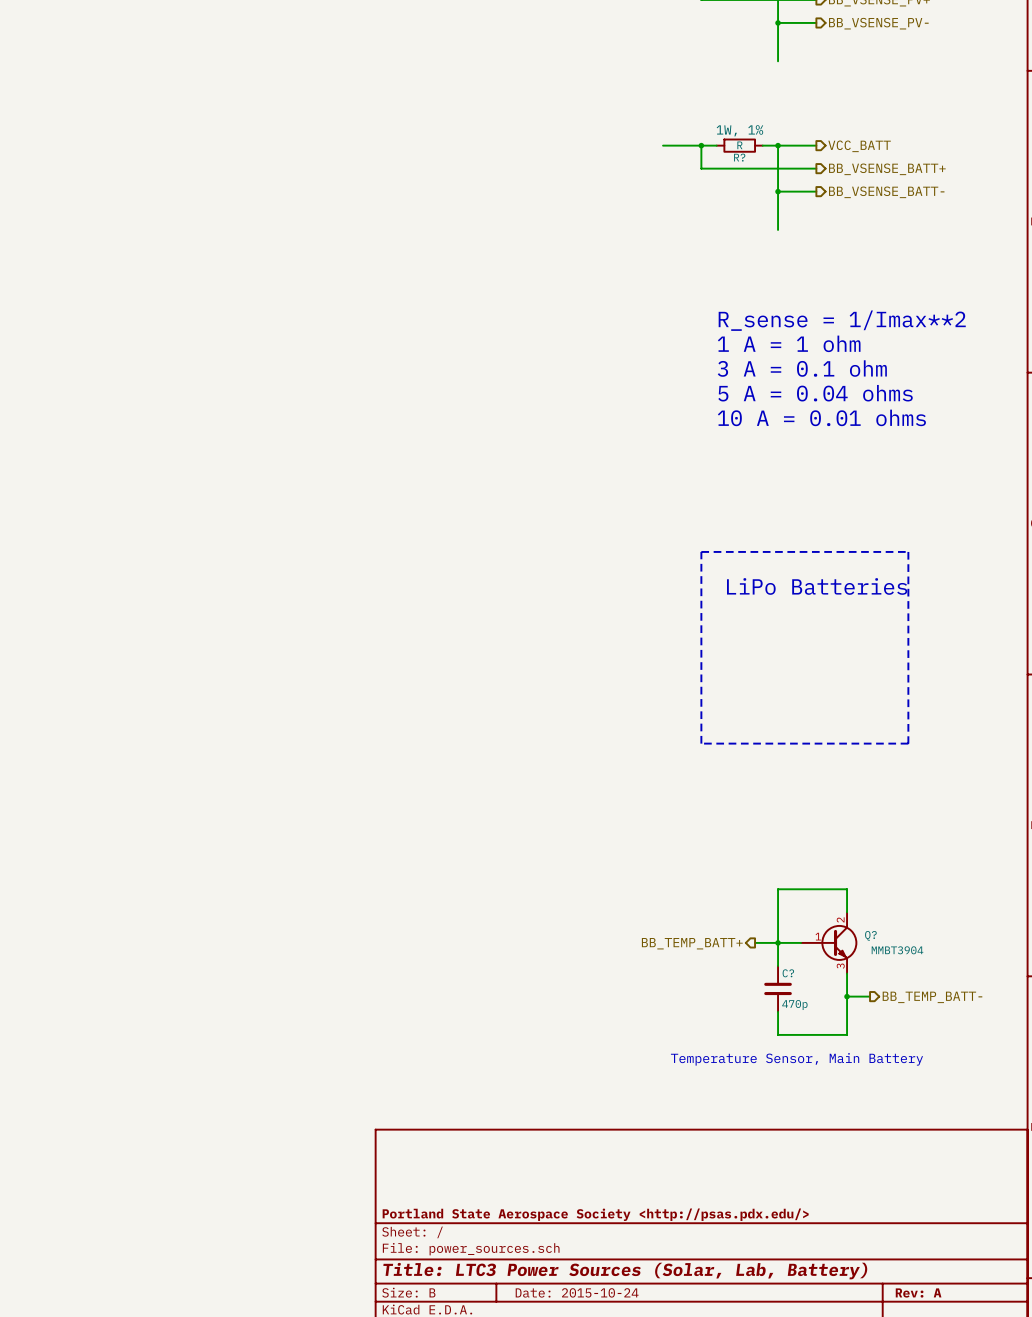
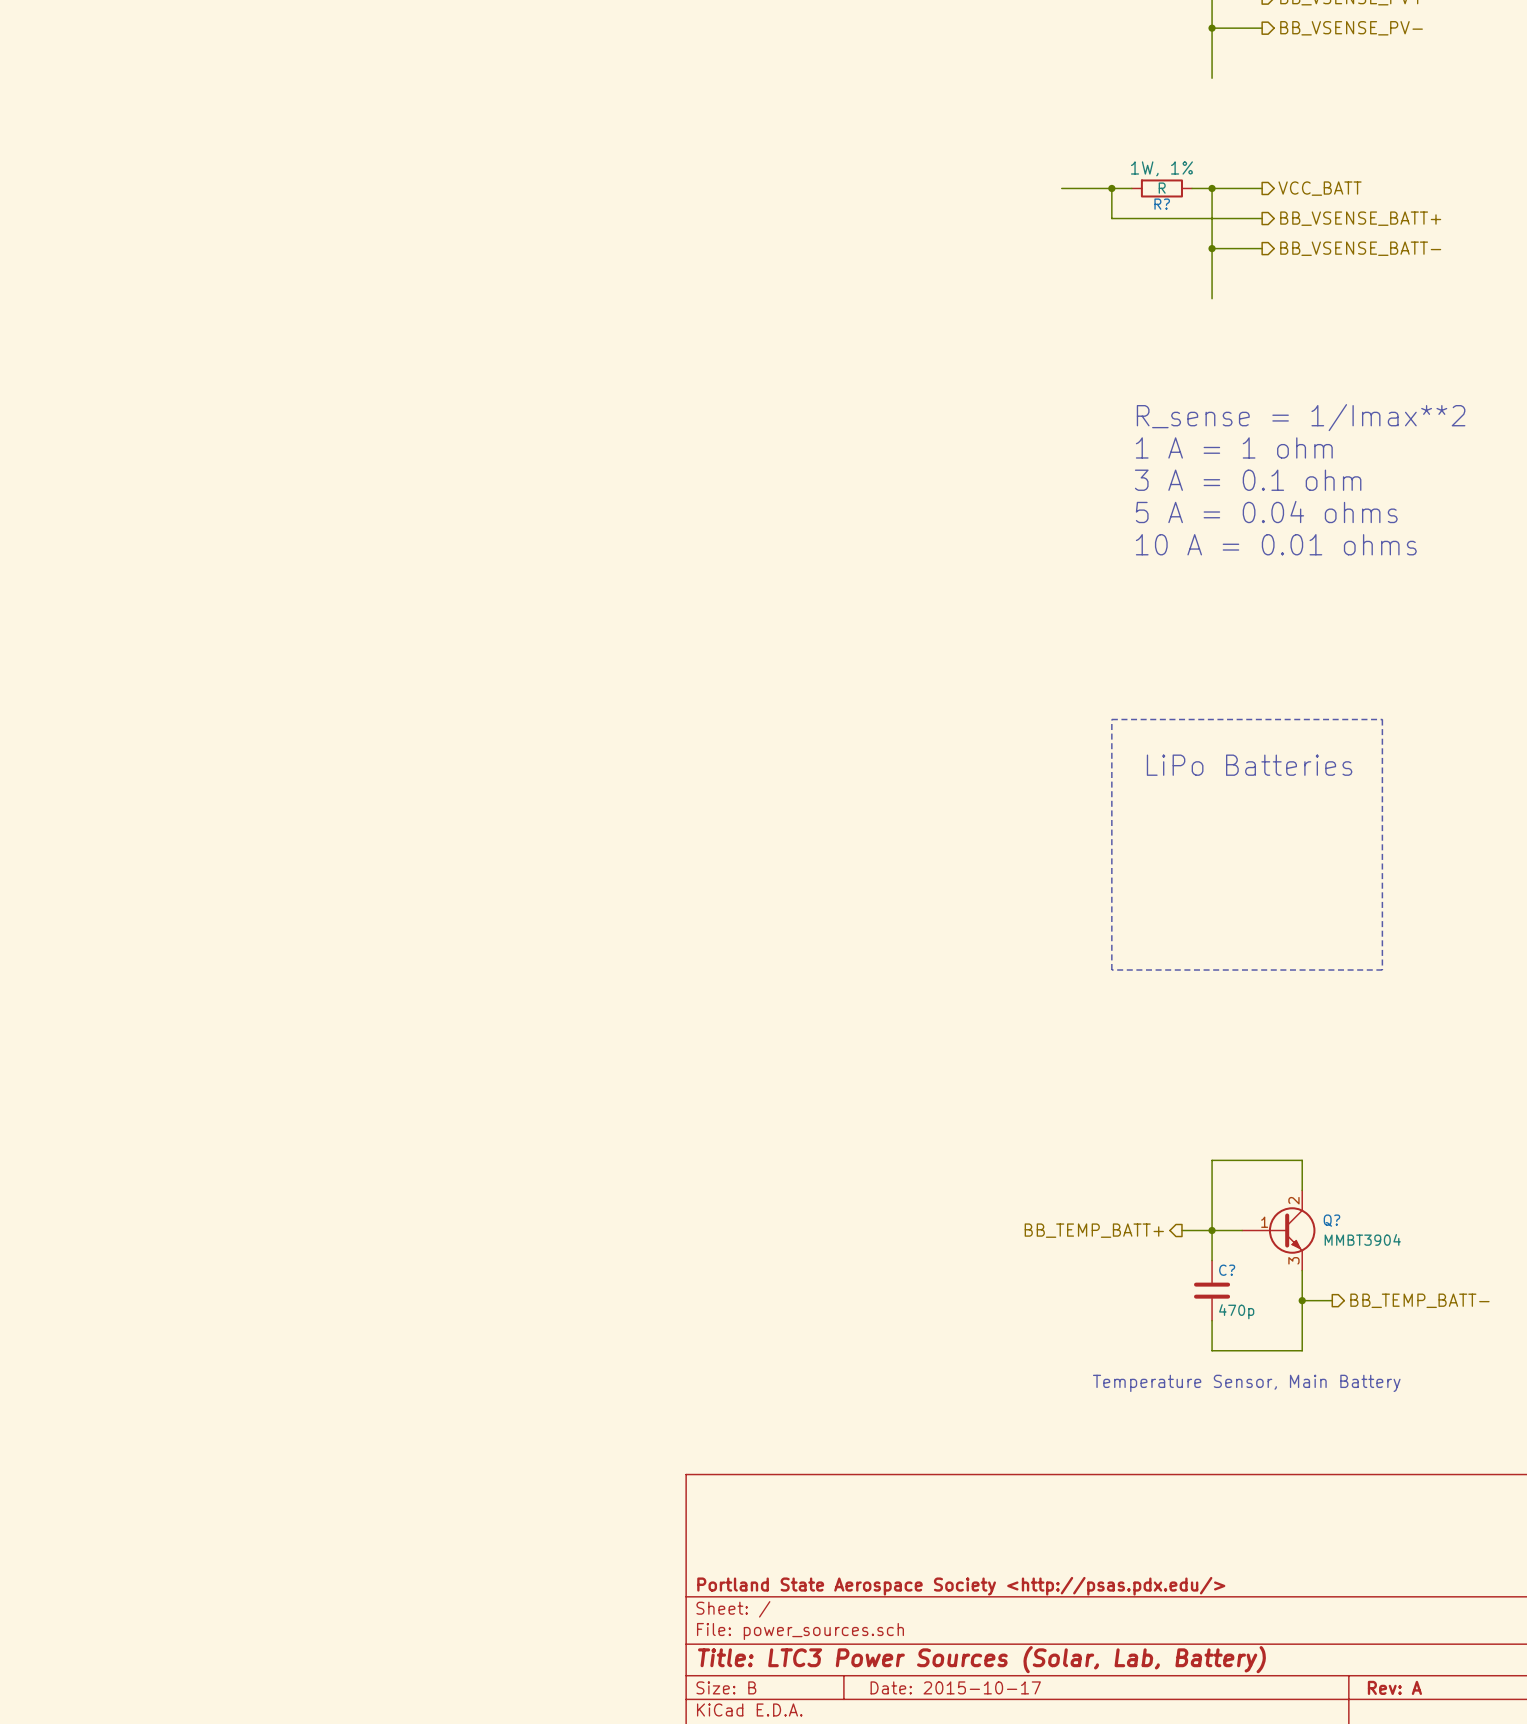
title block: Date: 2015-10-24 (577, 1292) -> Date: 2015-10-17 (955, 1687)

